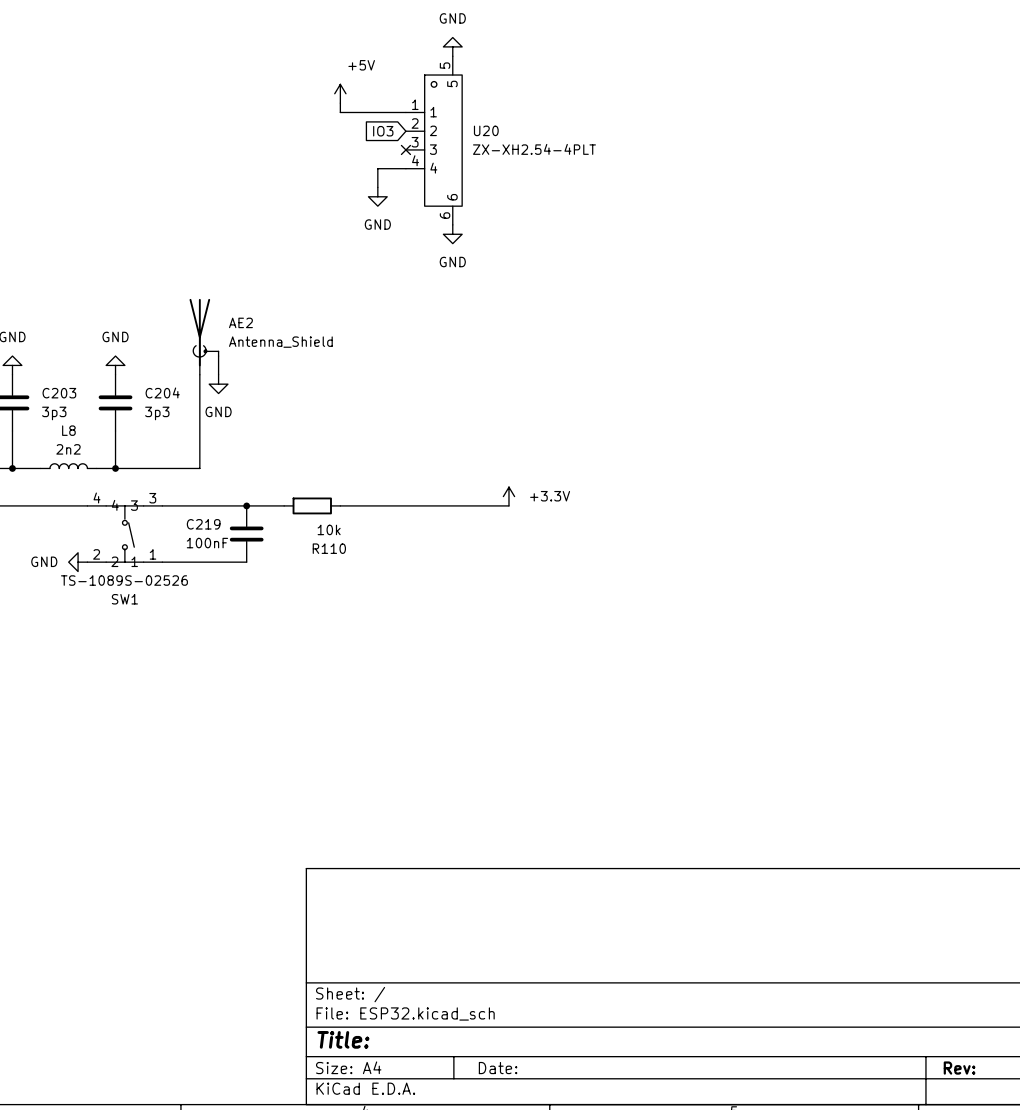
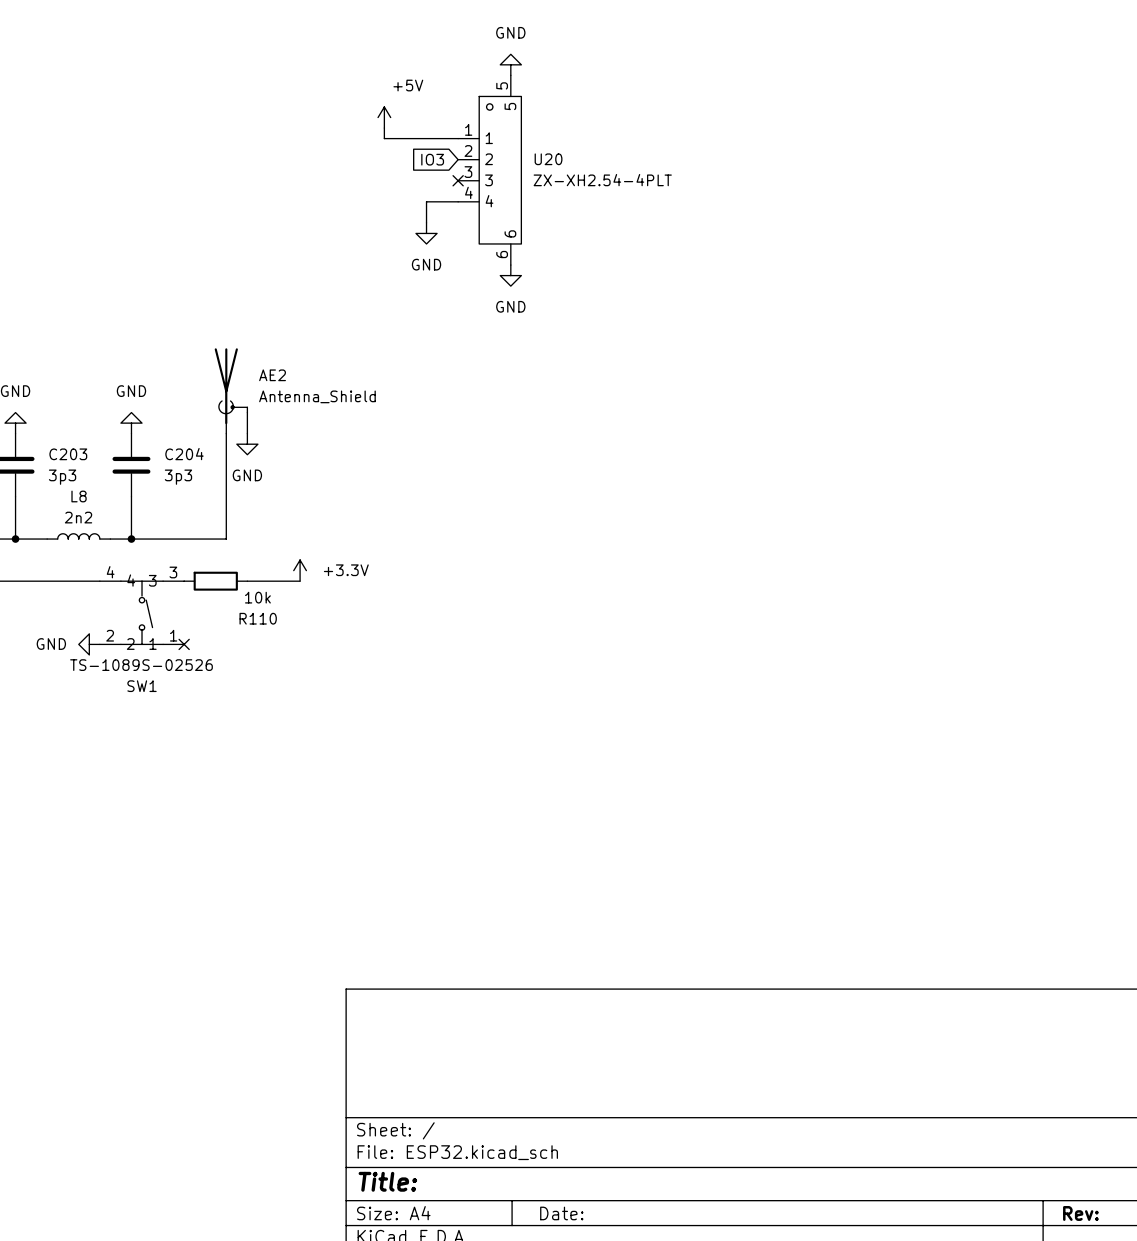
power symbol: none -> +3.3V (300, 570)
power symbol: +3.3V (508, 496) -> none
wire: (162, 505) (218, 505) -> none
junction: (246, 505) -> none
wire: (265, 505) (284, 505) -> none
R110 position: (312, 505) -> (215, 581)
wire: (340, 505) (508, 505) -> none
R110 value position: 10k (329, 529) -> 10k (257, 597)
C219: 100nF (246, 534) -> none
R110 name position: R110 (329, 548) -> R110 (258, 618)
wire: (162, 562) (246, 562) -> none
no-connect mark: none -> (184, 644)

